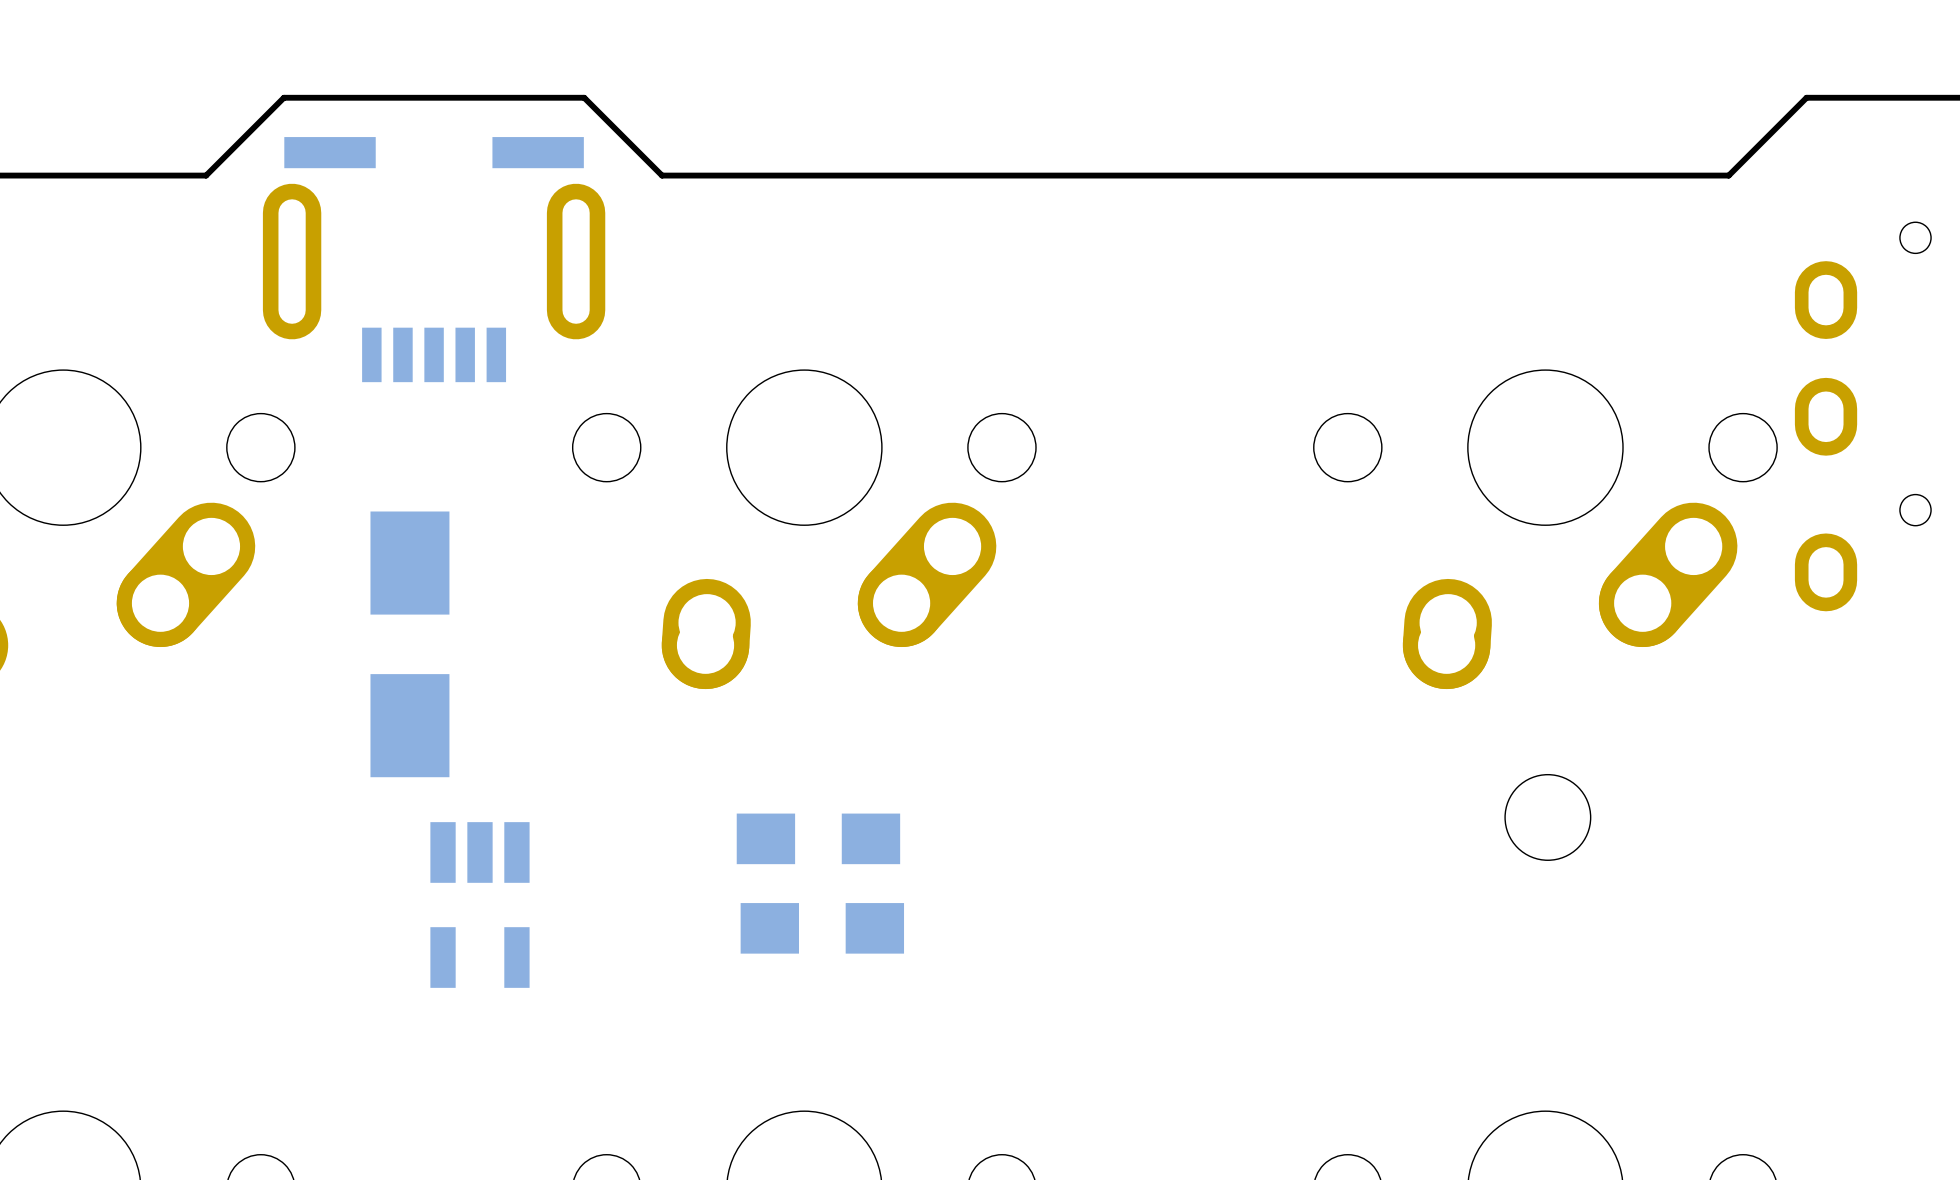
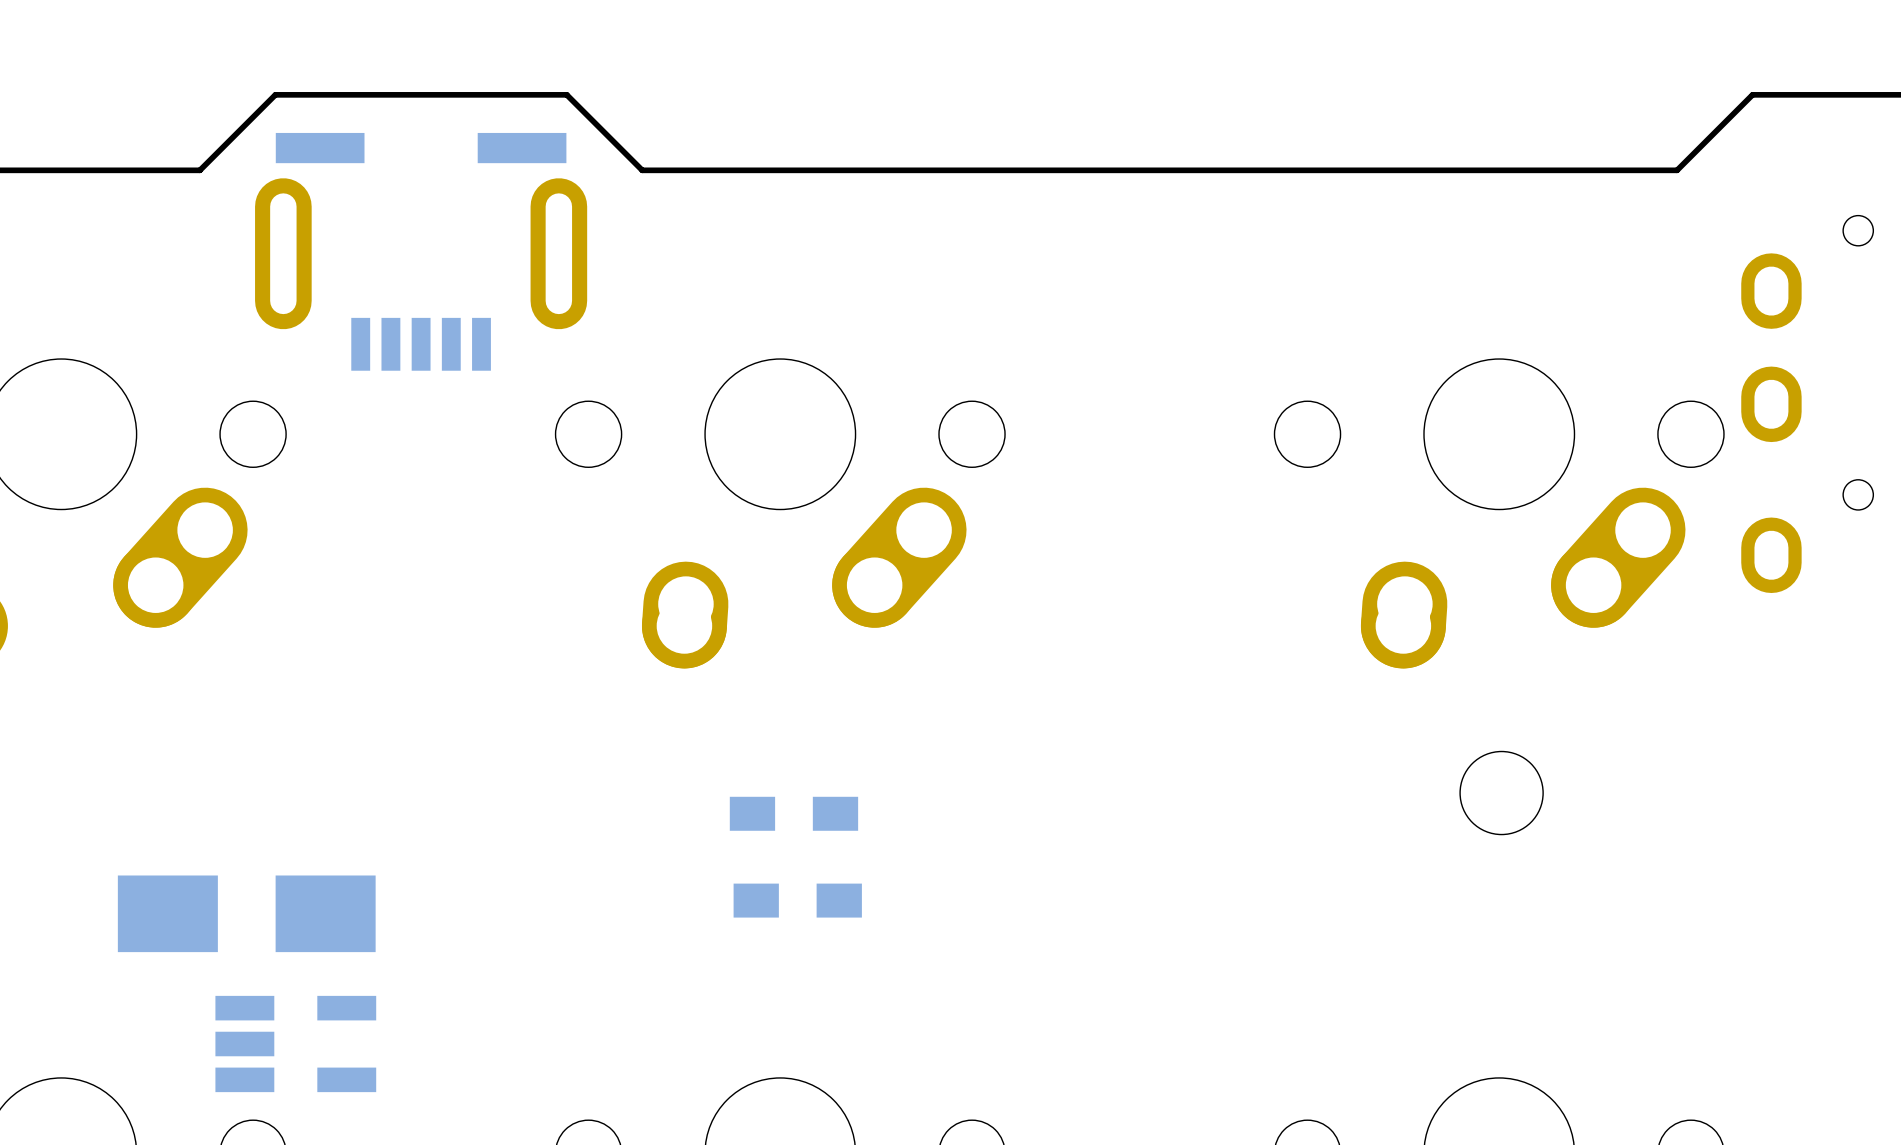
part rotation: 0° (409, 644) -> 90° clockwise (246, 913)
part position: (409, 644) -> (246, 913)
part footprint: [736, 813, 901, 865] -> [729, 796, 859, 831]
part footprint: [740, 903, 905, 954] -> [733, 883, 862, 918]
part rotation: 0° (479, 905) -> 90° counterclockwise (295, 1044)
part position: (479, 905) -> (295, 1044)

